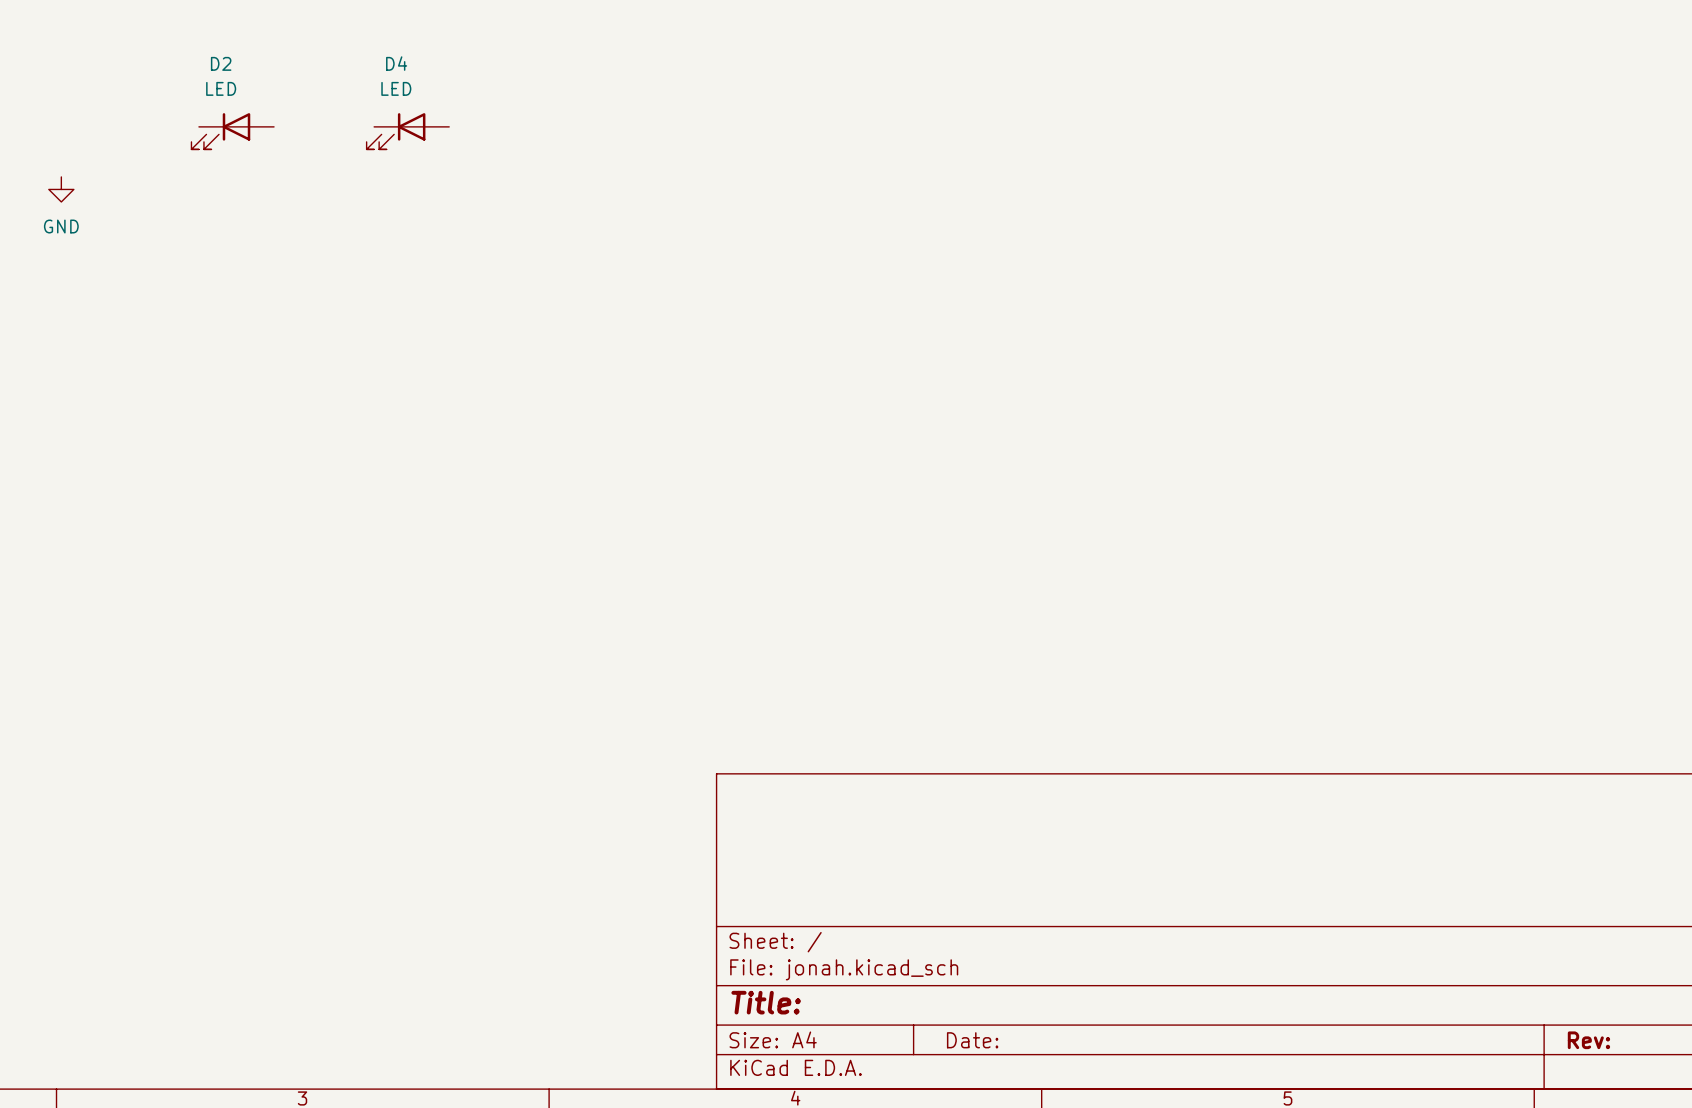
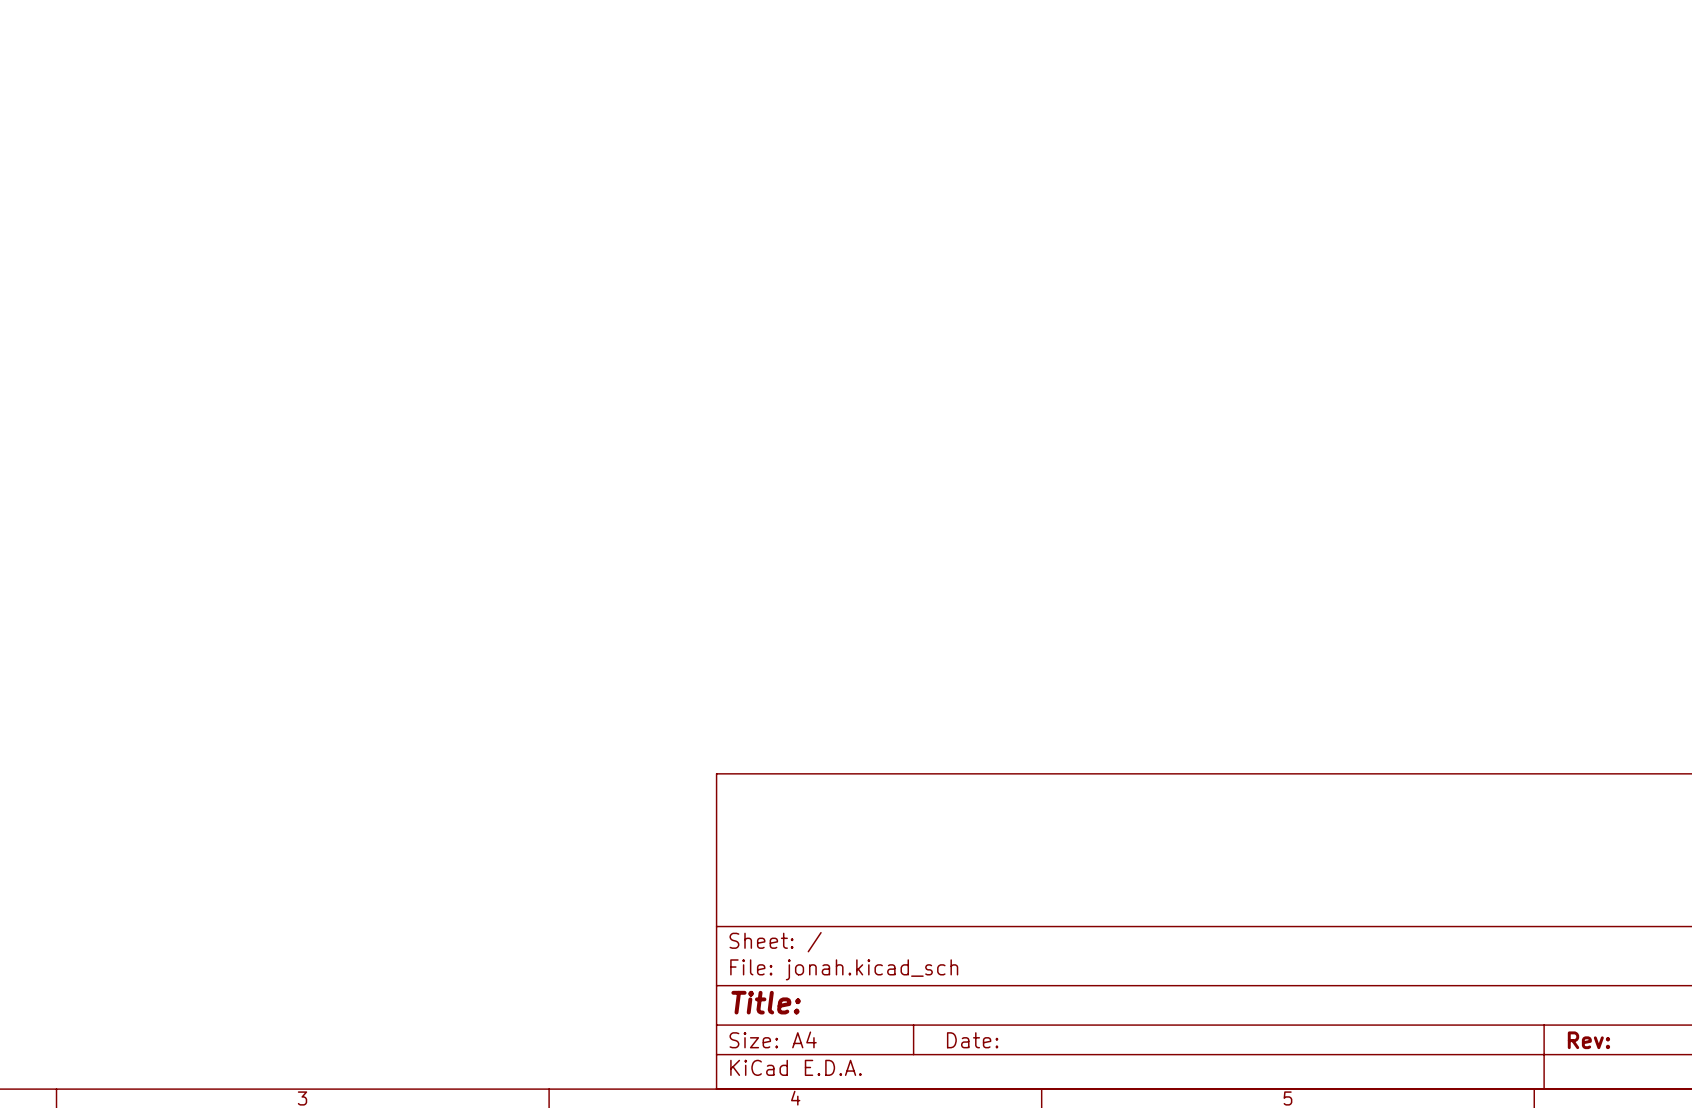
D2: LED (232, 131) -> none
D4: LED (407, 131) -> none
power symbol: GND (61, 189) -> none

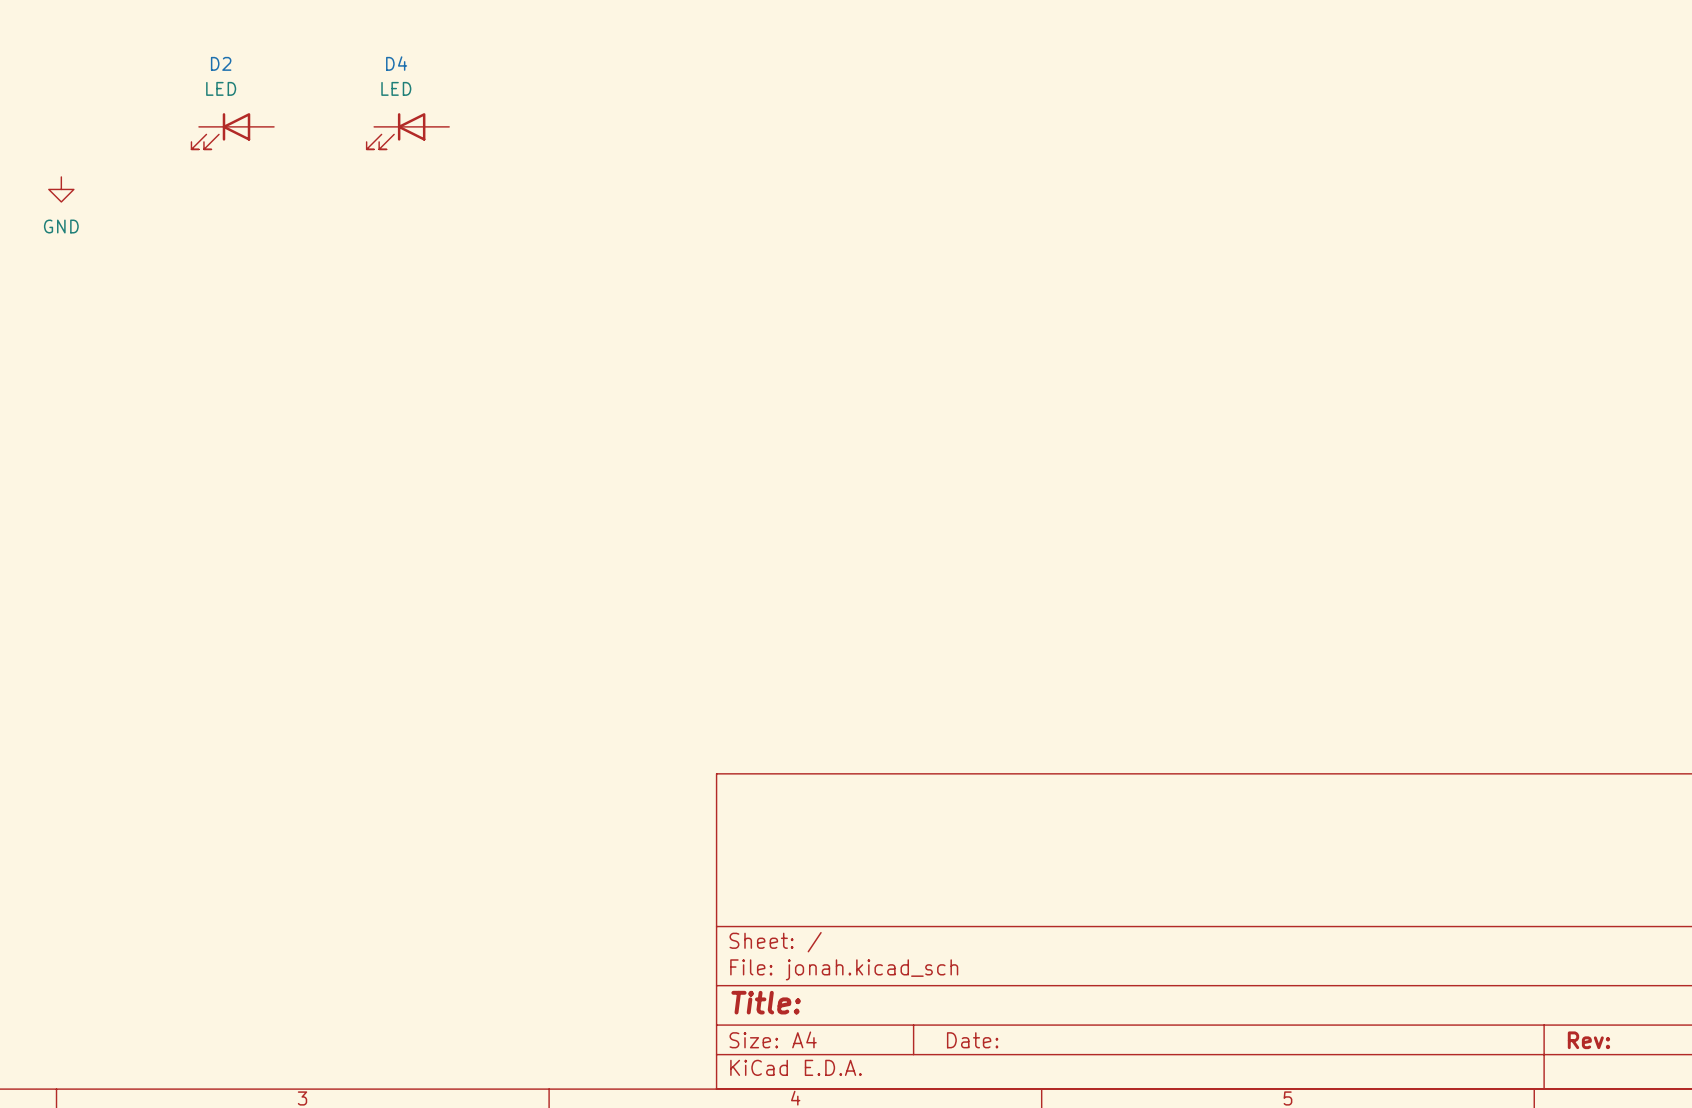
D2: none -> LED (232, 131)
D4: none -> LED (407, 131)
power symbol: none -> GND (61, 189)

